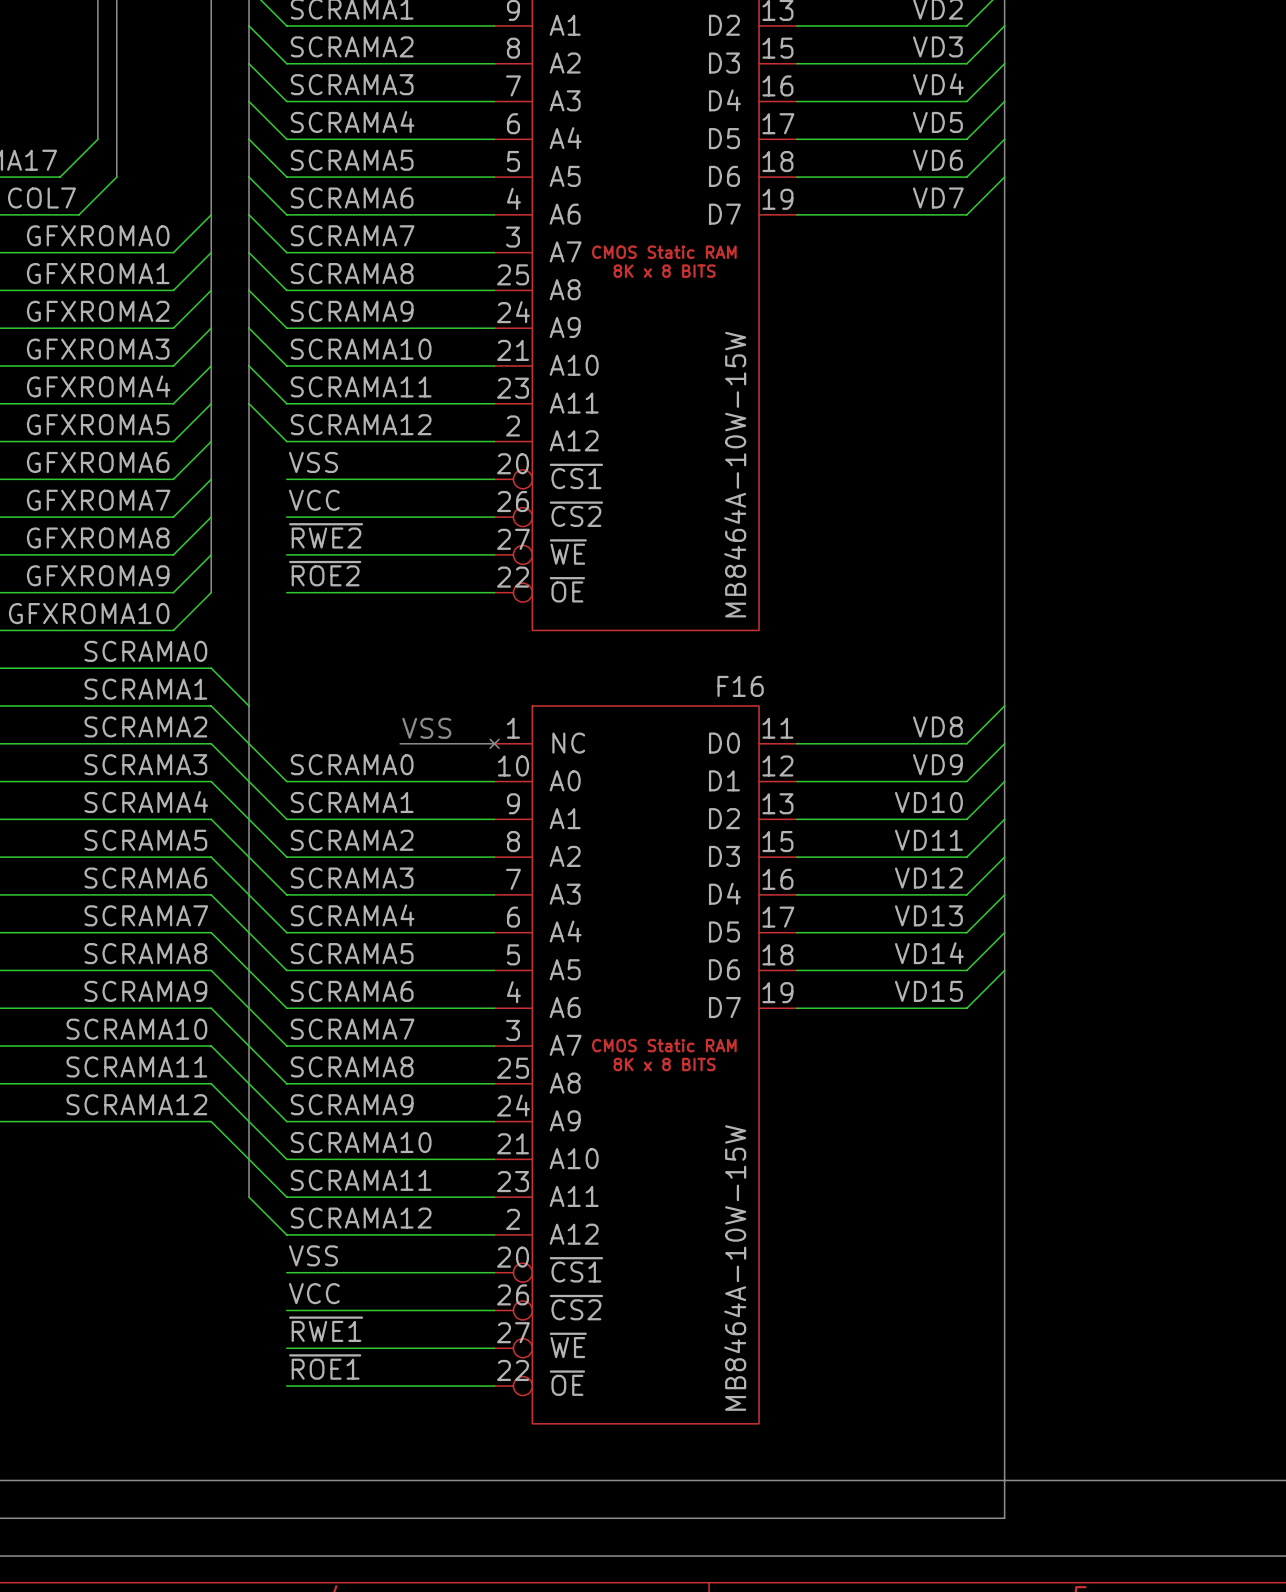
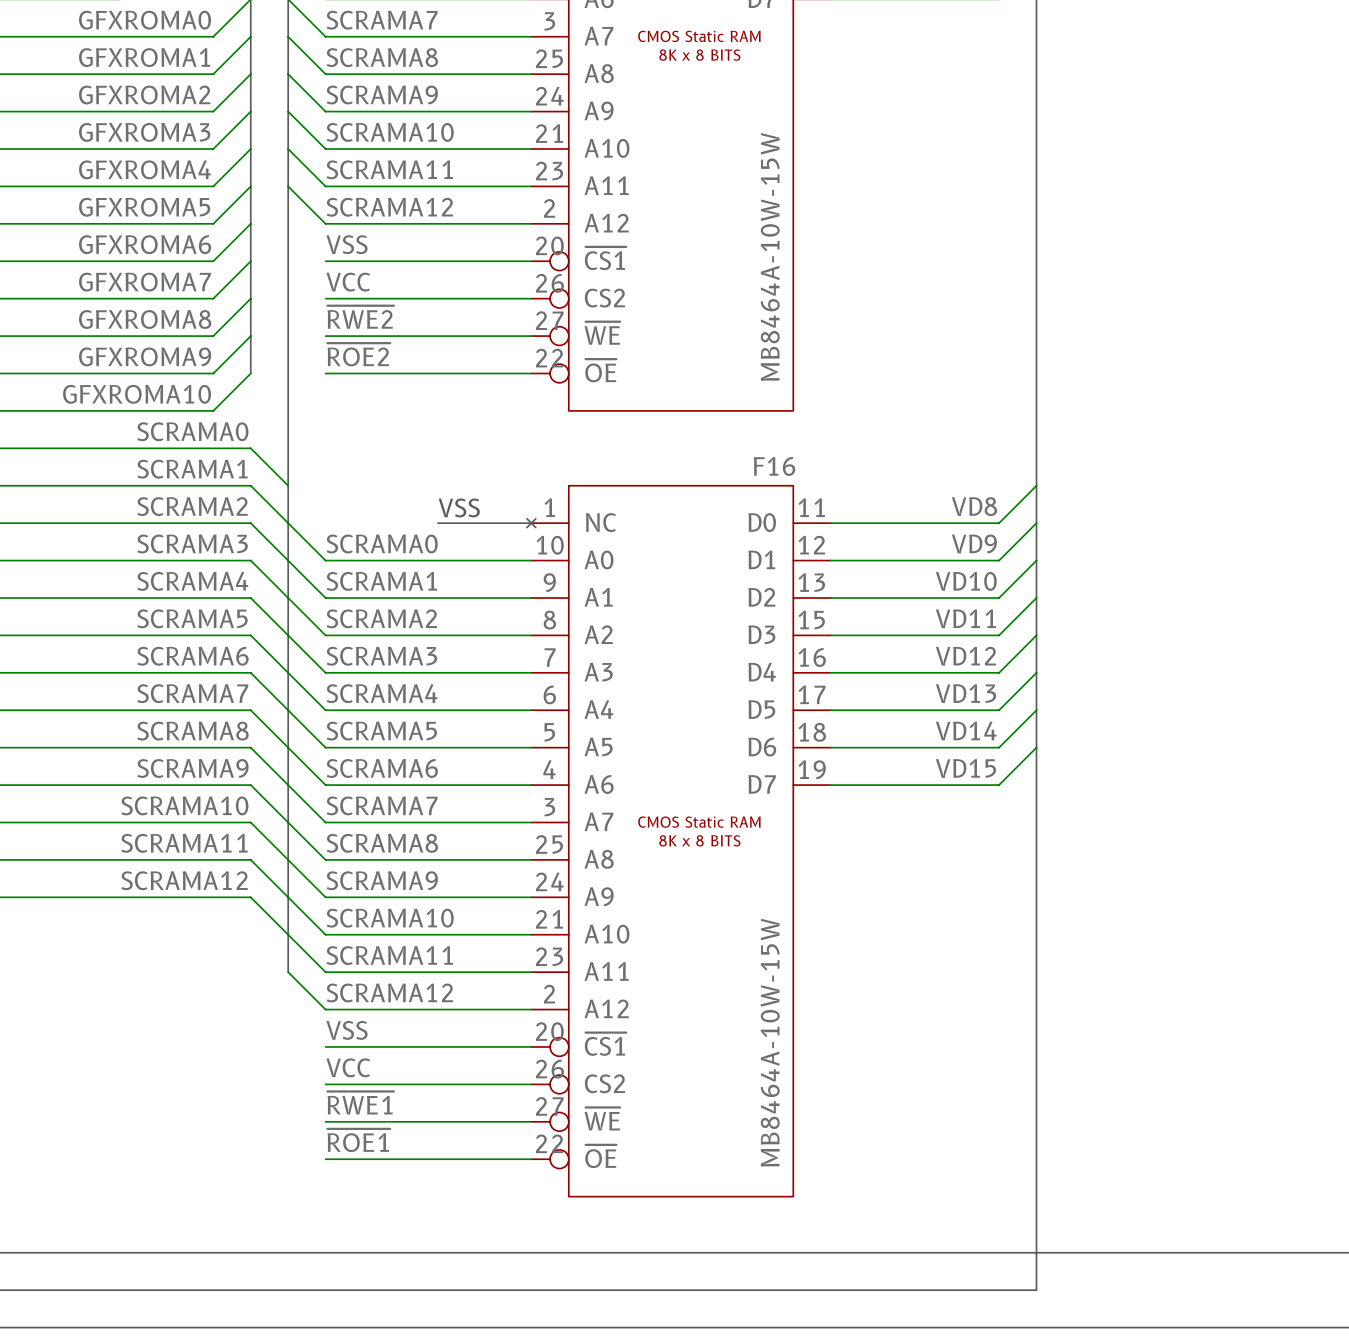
part pin name: ~{CS2} (576, 514) -> CS2 (604, 298)
F16 pin name: ~{CS2} (576, 1307) -> CS2 (604, 1083)

